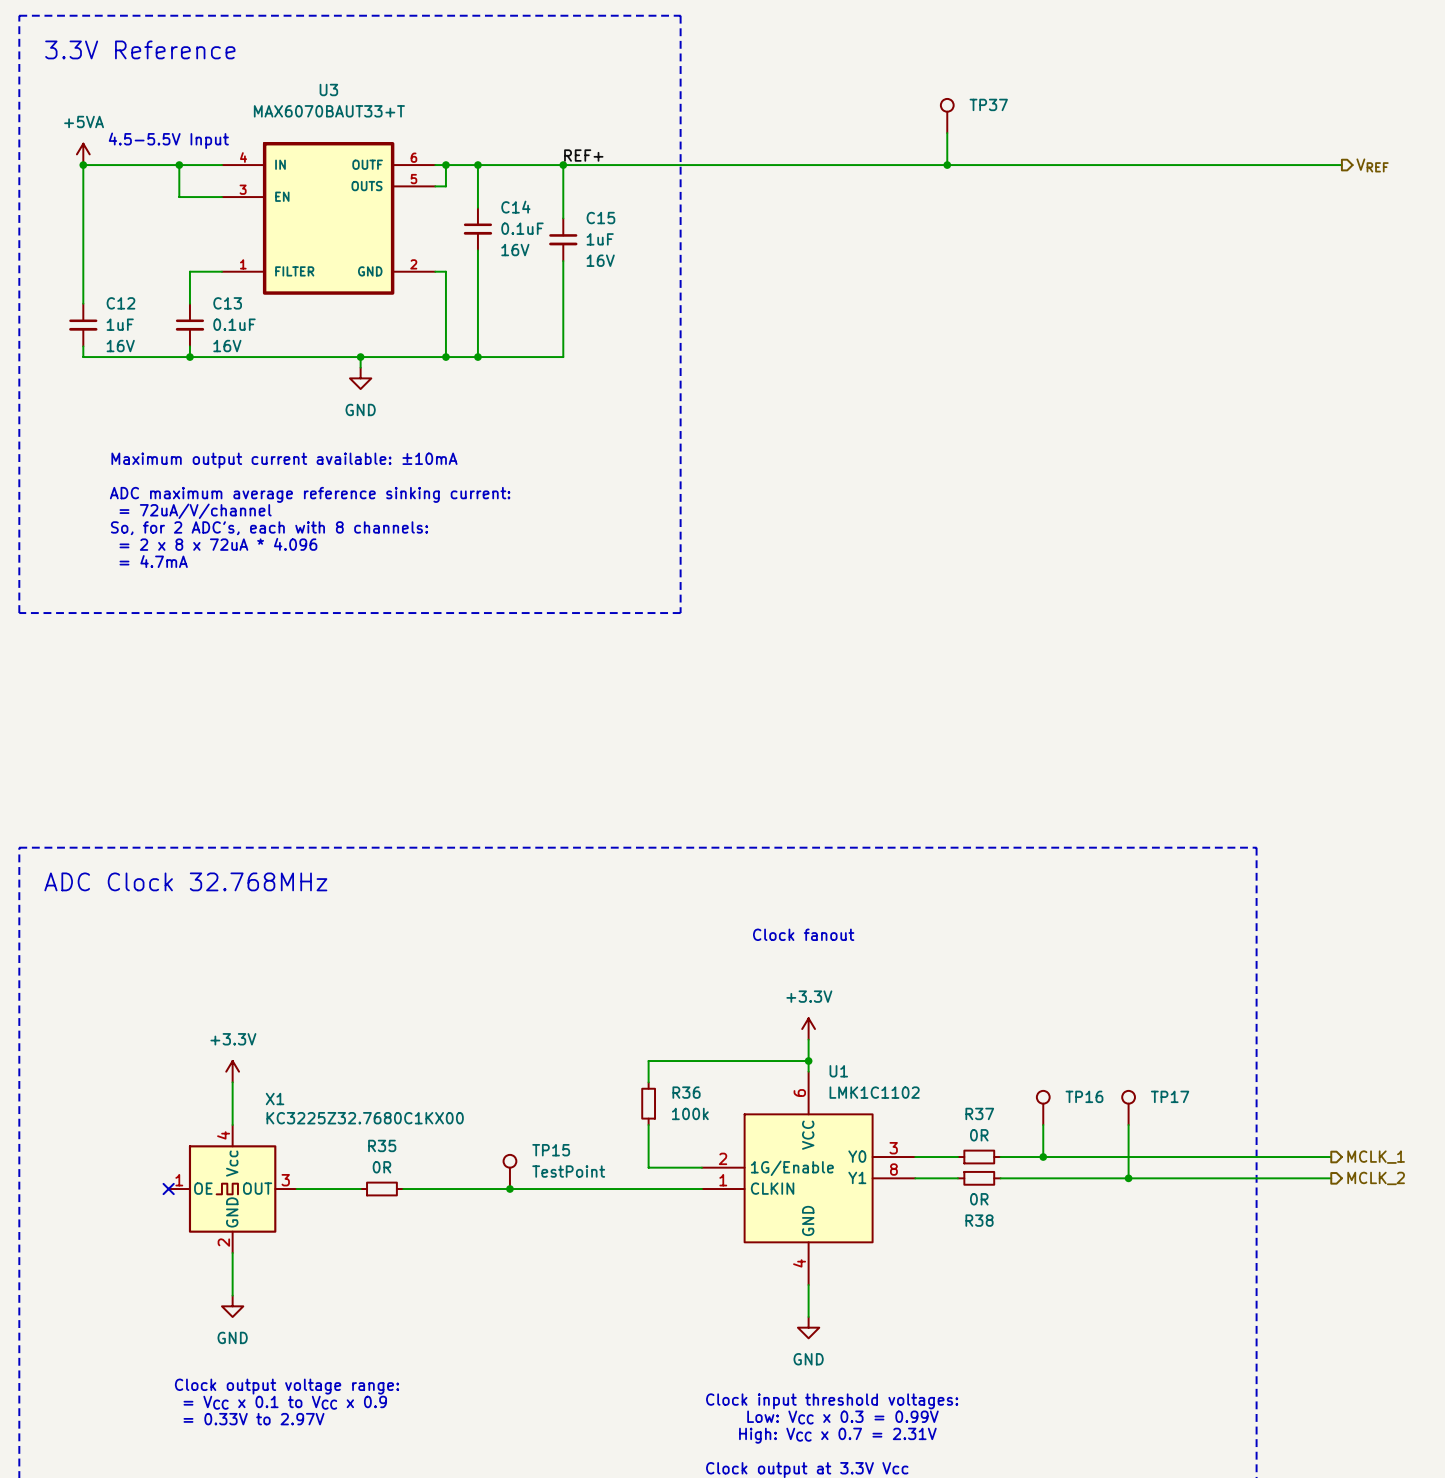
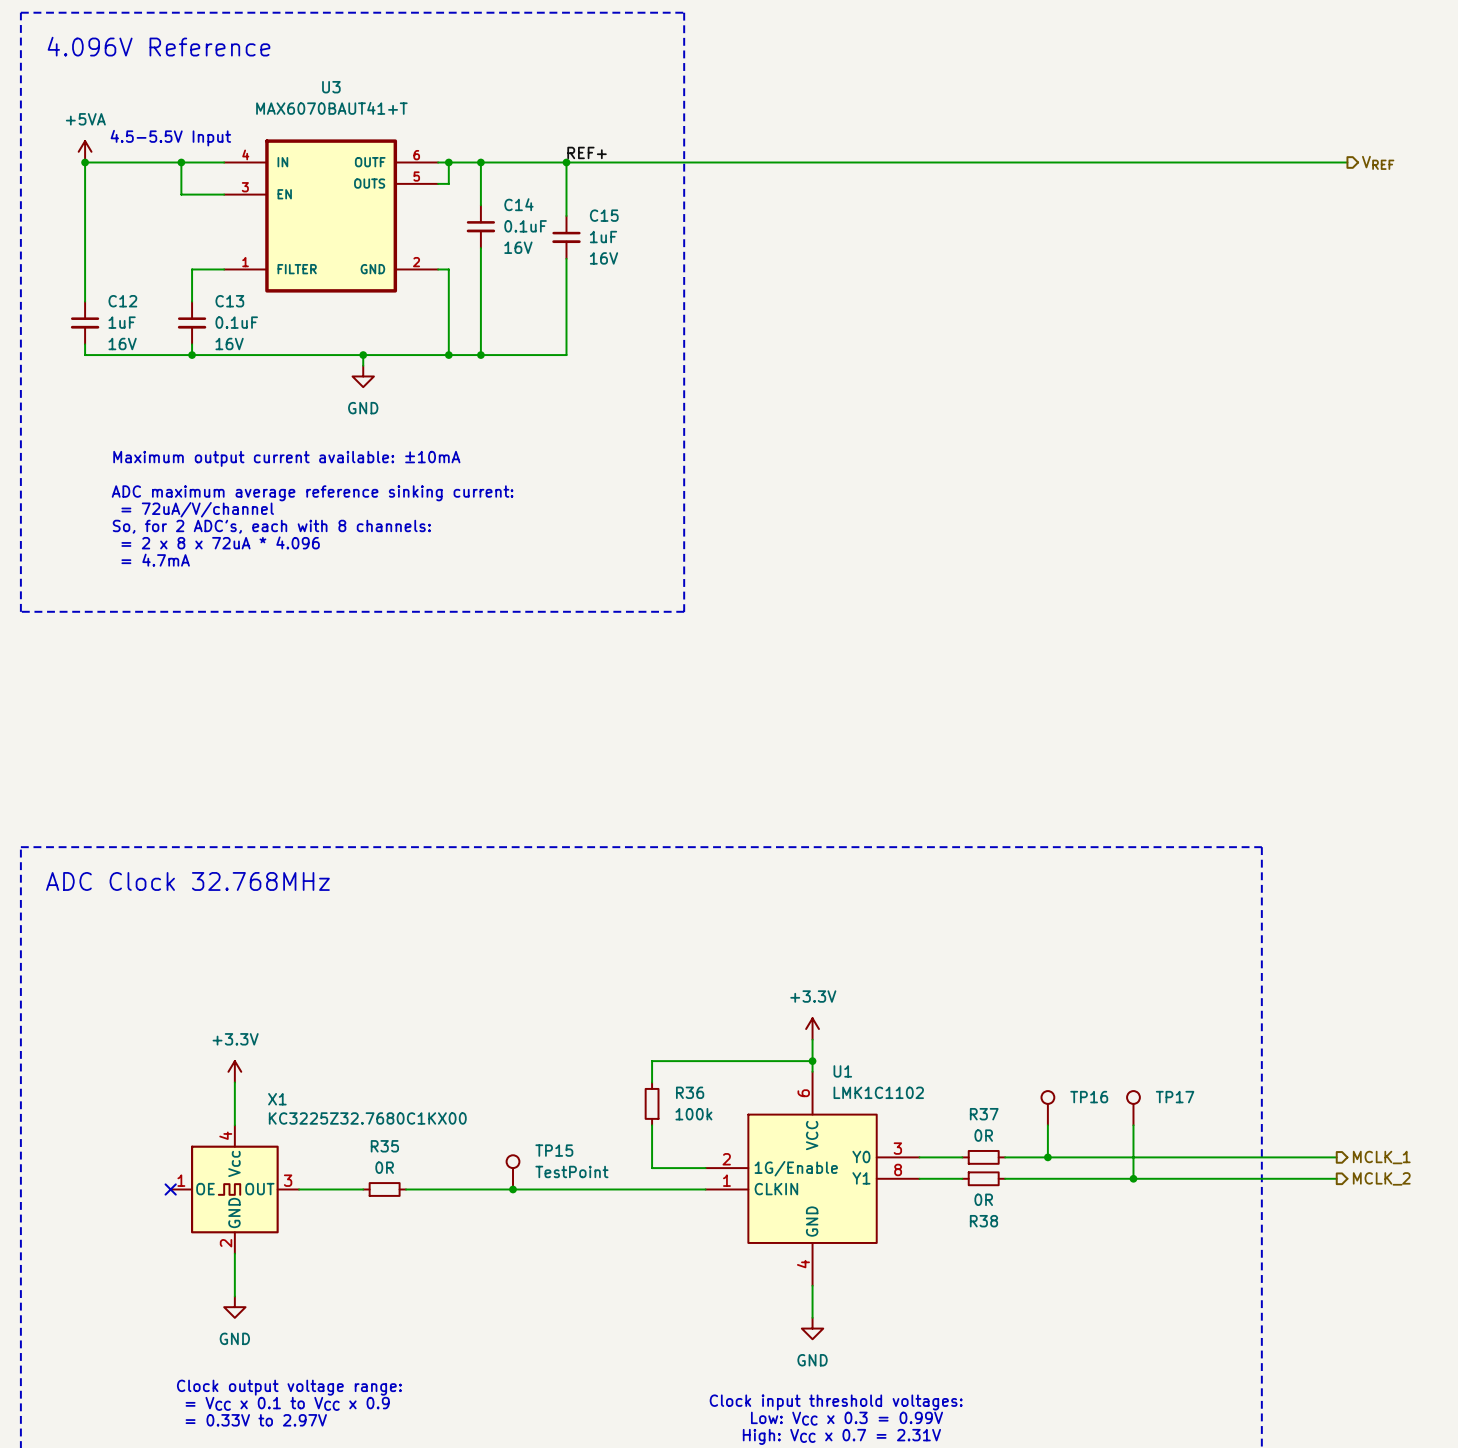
text: 3.3V Reference (140, 49) -> 4.096V Reference (158, 46)
U3 value: MAX6070BAUT33+T (329, 111) -> MAX6070BAUT41+T (331, 108)
TP37: (947, 115) -> none
wire: (947, 133) (947, 165) -> none
junction: (947, 165) -> none
text: Clock fanout (803, 934) -> none

